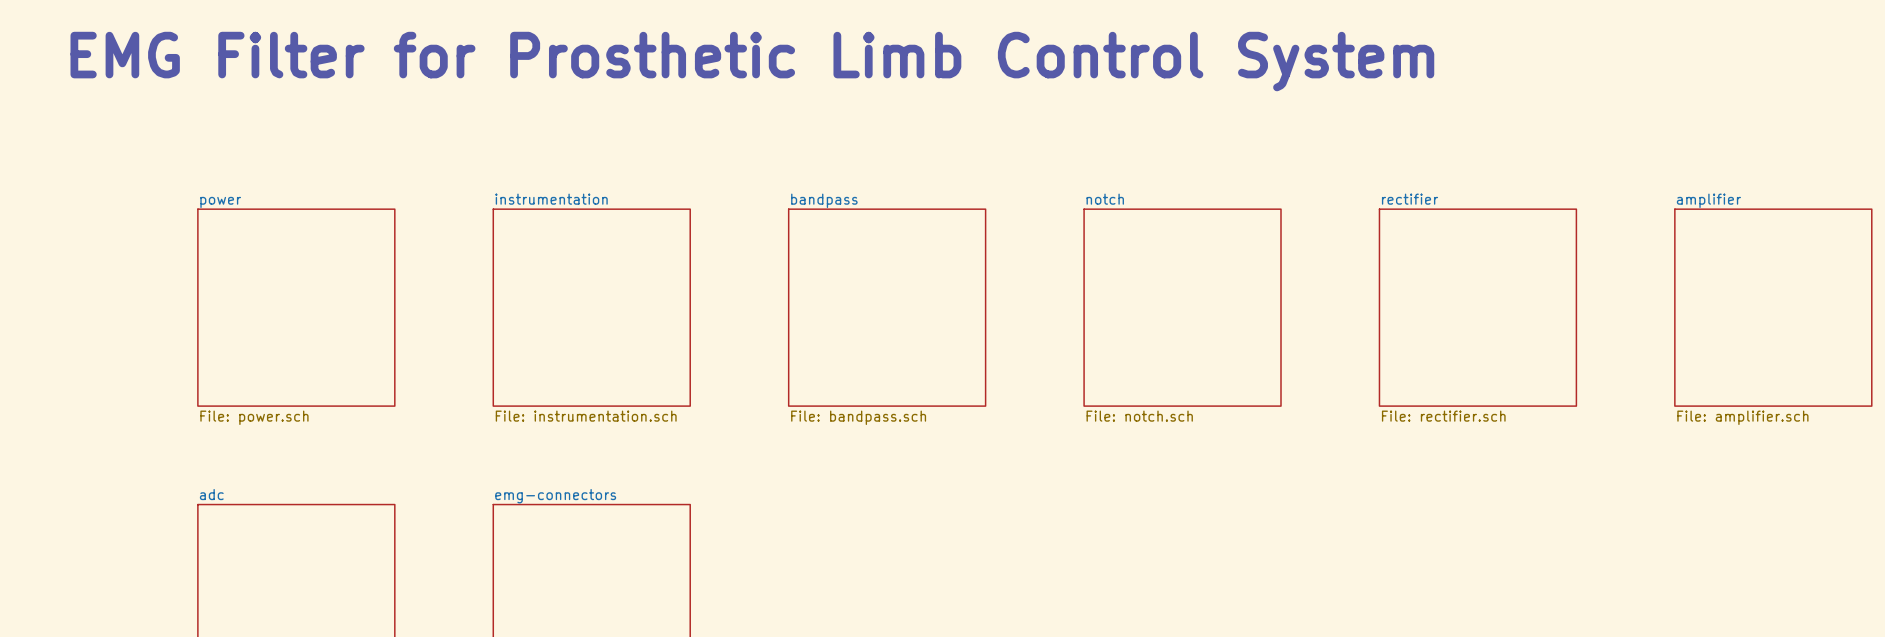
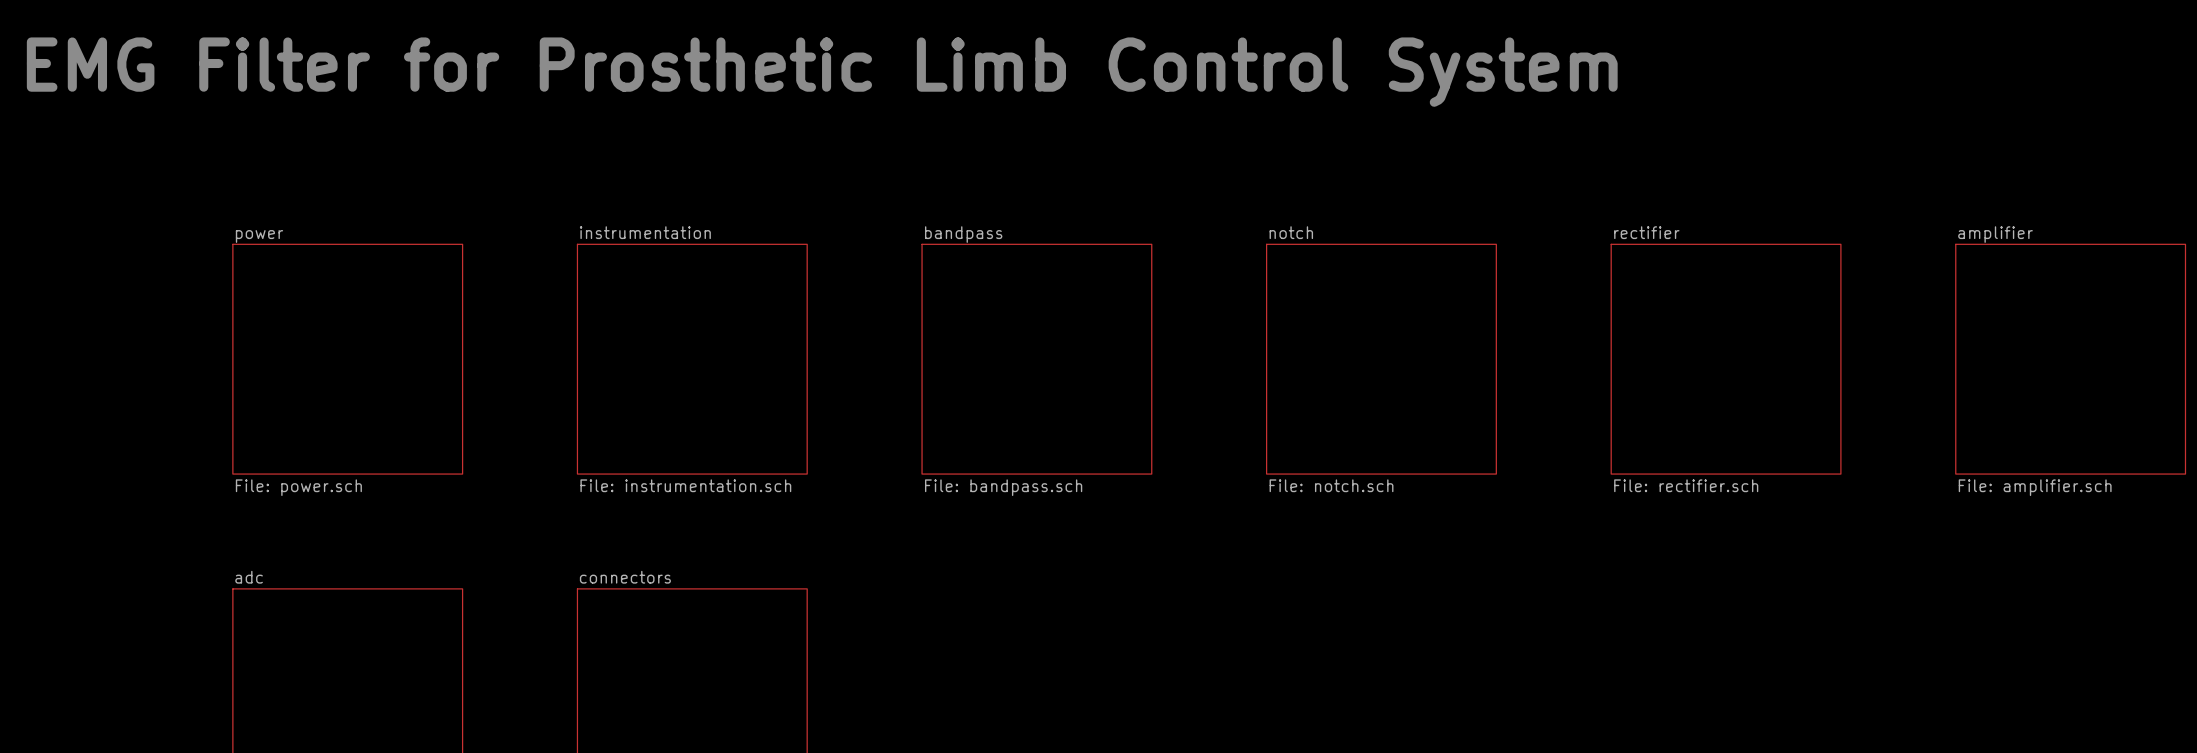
text position: EMG Filter for Prosthetic Limb Control System (752, 61) -> EMG Filter for Prosthetic Limb Control System (822, 72)
sheet emg-connectors name: emg-connectors (555, 496) -> connectors (625, 577)

